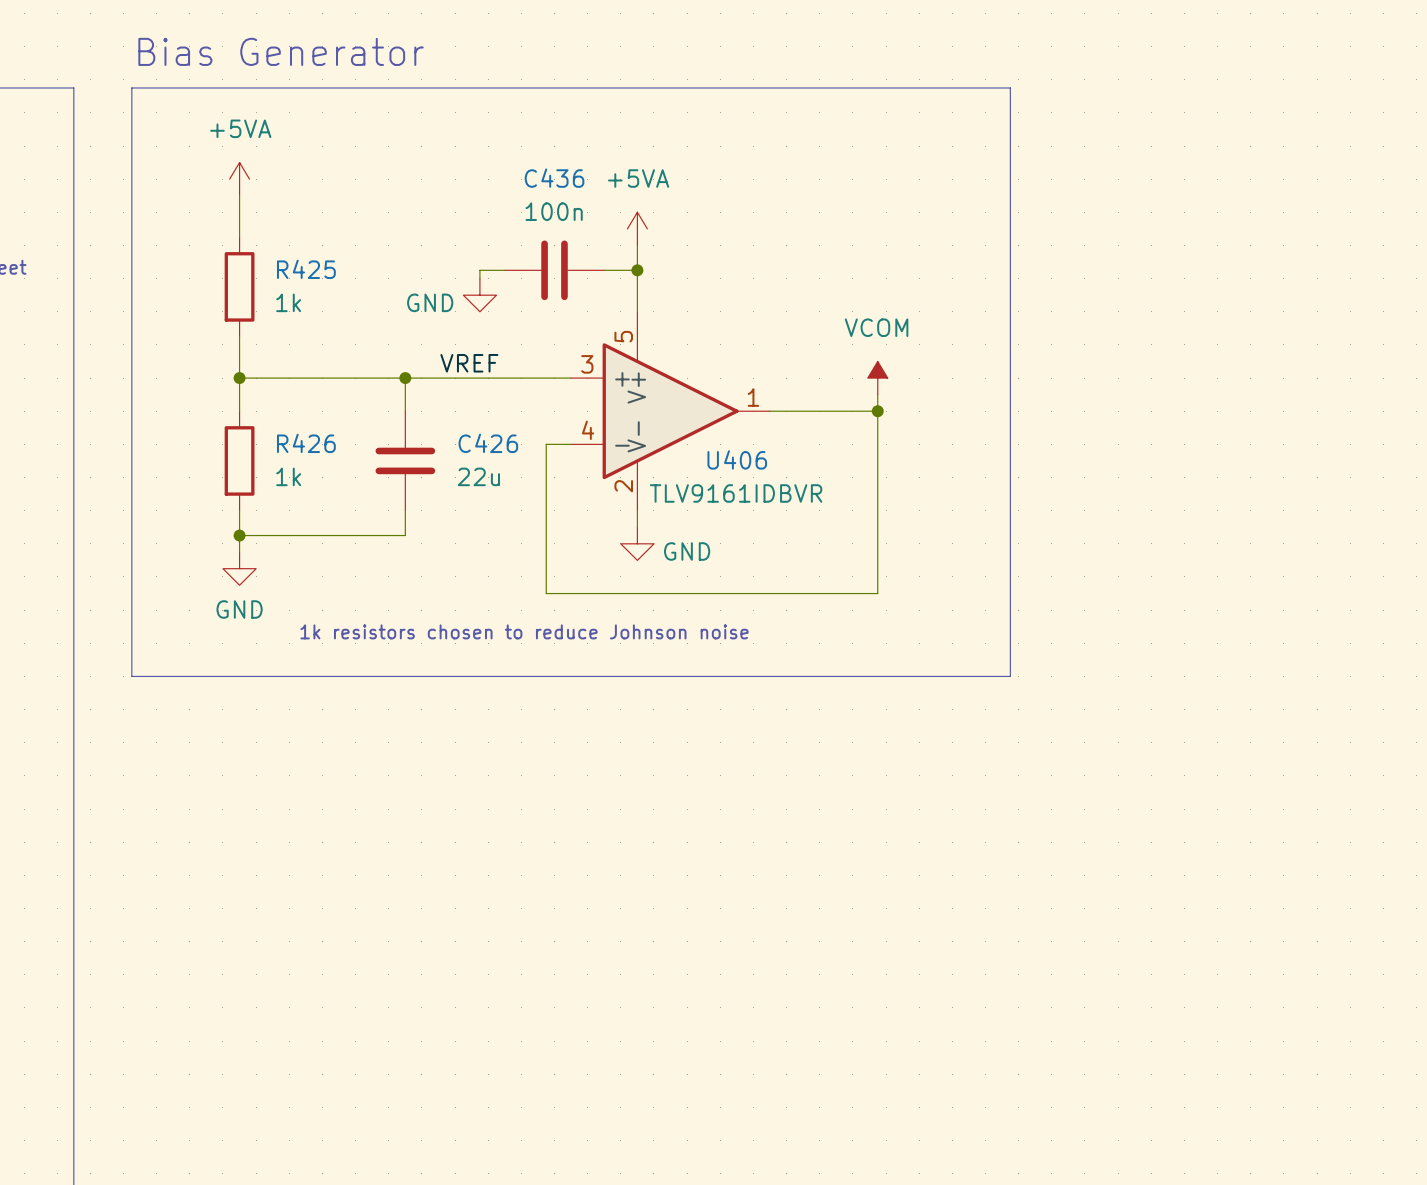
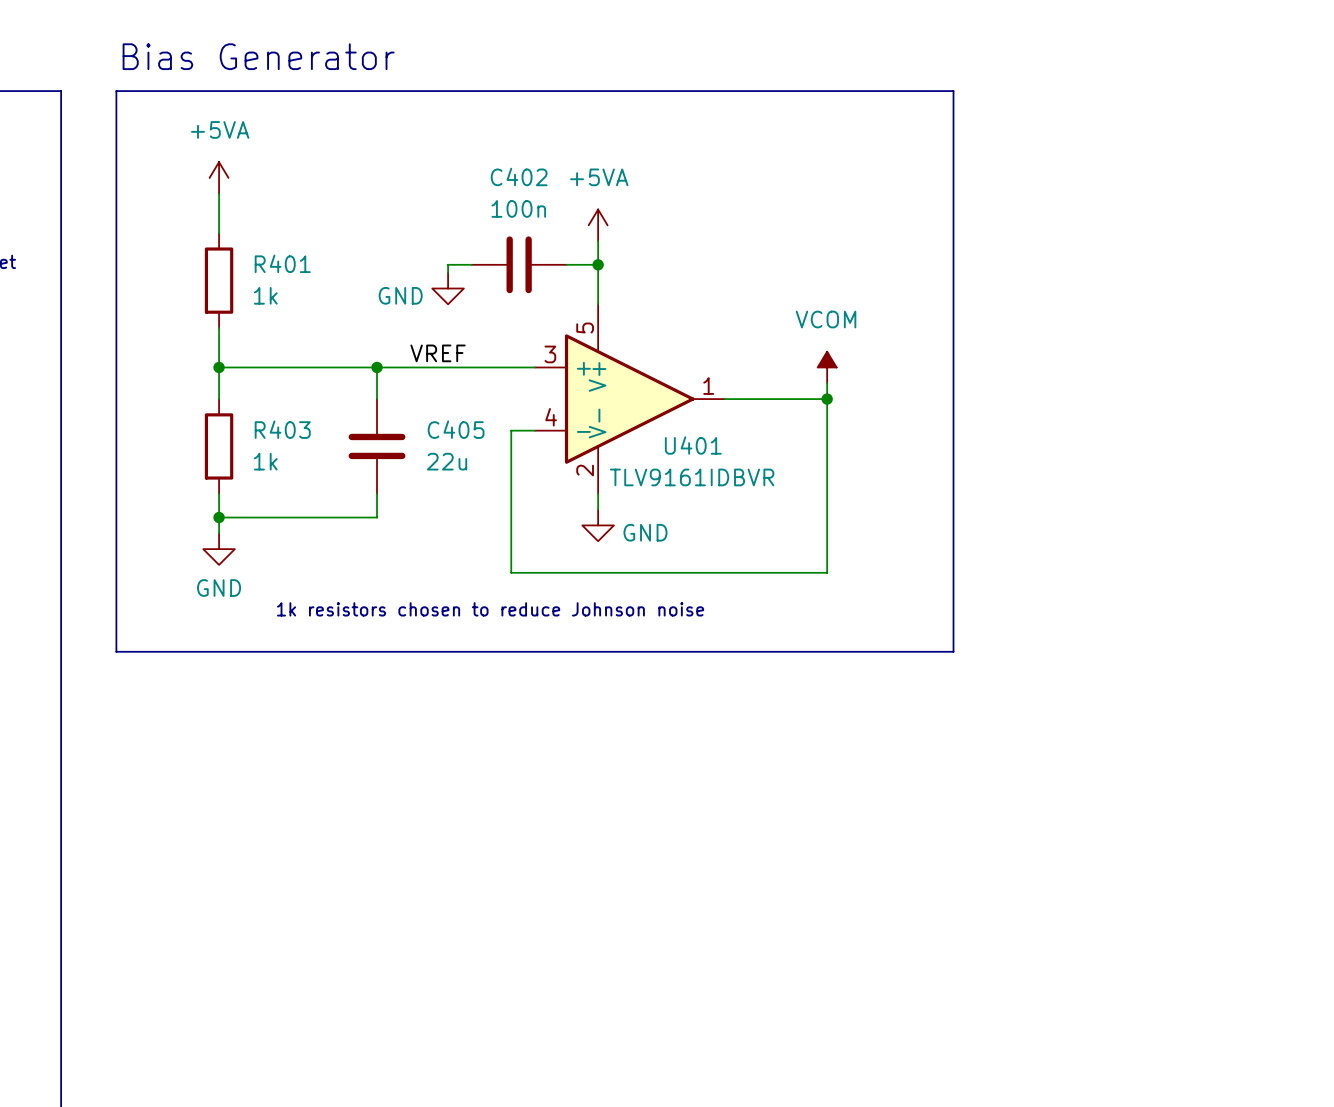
C436 name: C436 (554, 178) -> C402 (519, 176)
R425 name: R425 (306, 269) -> R401 (282, 263)
R426 name: R426 (306, 443) -> R403 (282, 429)
C426 name: C426 (488, 443) -> C405 (456, 429)
U406 name: U406 (737, 459) -> U401 (693, 445)

